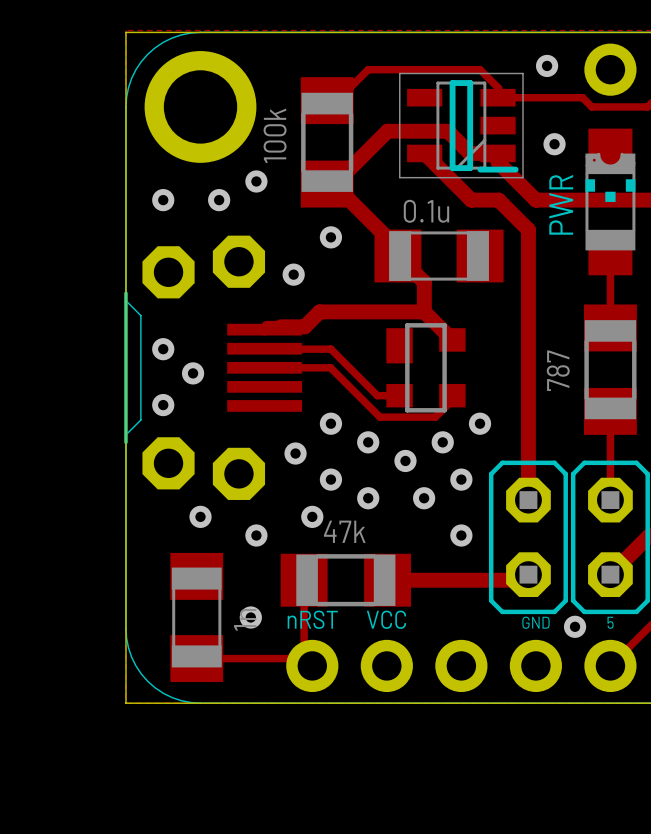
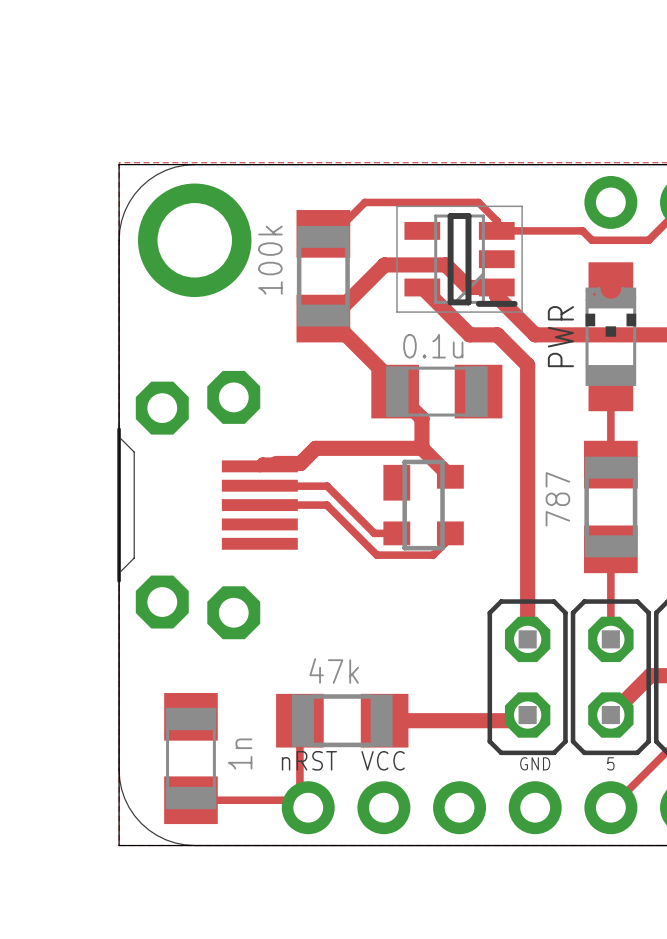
via: (547, 65) -> none
via: (554, 144) -> none
via: (256, 181) -> none
via: (163, 200) -> none
via: (219, 200) -> none
via: (330, 237) -> none
via: (293, 274) -> none
via: (163, 349) -> none
via: (193, 373) -> none
via: (163, 405) -> none
via: (330, 423) -> none
via: (480, 423) -> none
via: (368, 442) -> none
via: (442, 442) -> none
via: (295, 453) -> none
via: (405, 460) -> none
via: (330, 479) -> none
via: (461, 479) -> none
via: (368, 498) -> none
via: (424, 498) -> none
via: (200, 516) -> none
via: (312, 516) -> none
via: (256, 535) -> none
via: (461, 535) -> none
via: (250, 617) -> none
via: (575, 626) -> none

